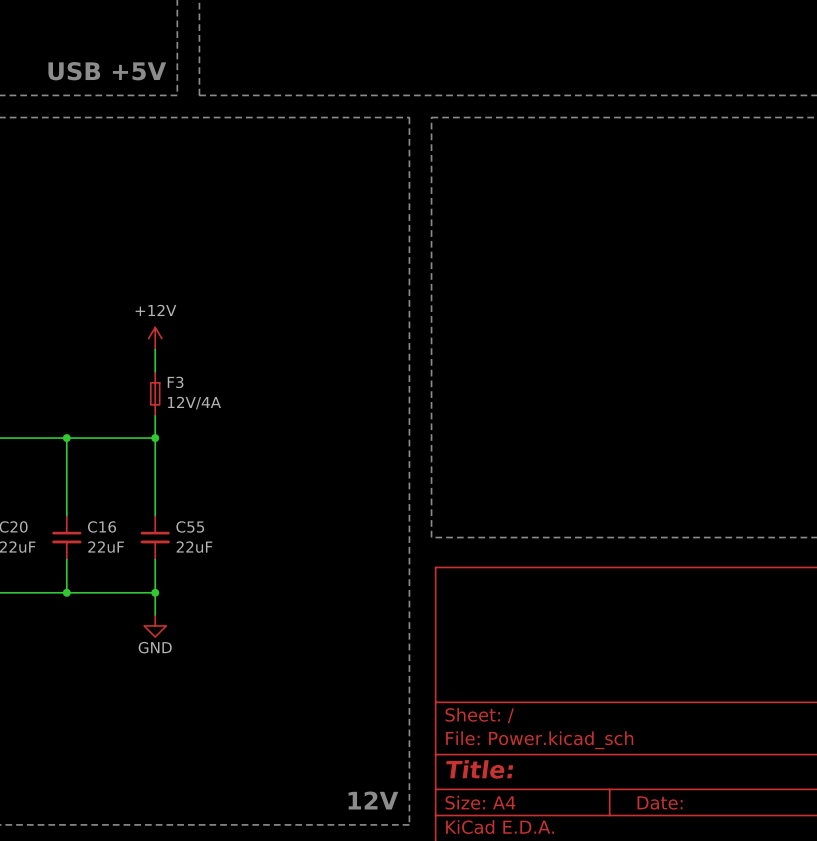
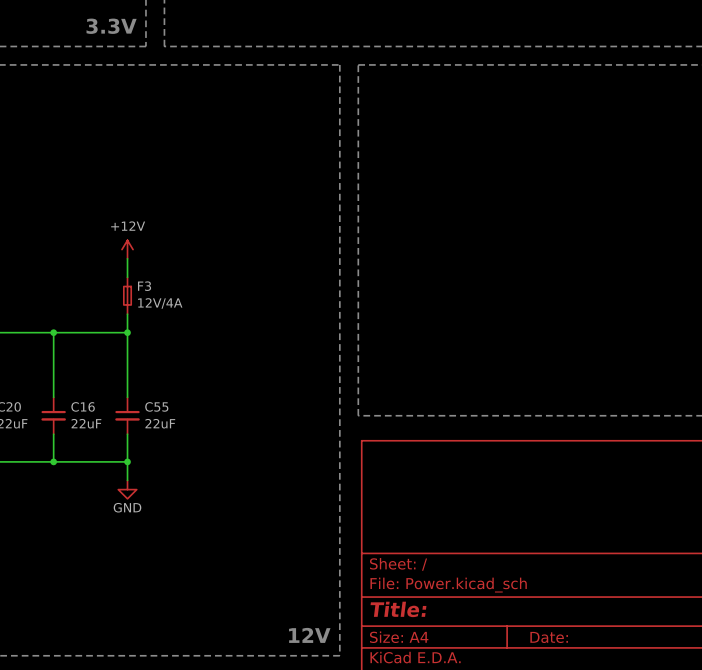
text: USB +5V (107, 71) -> 3.3V (111, 26)

